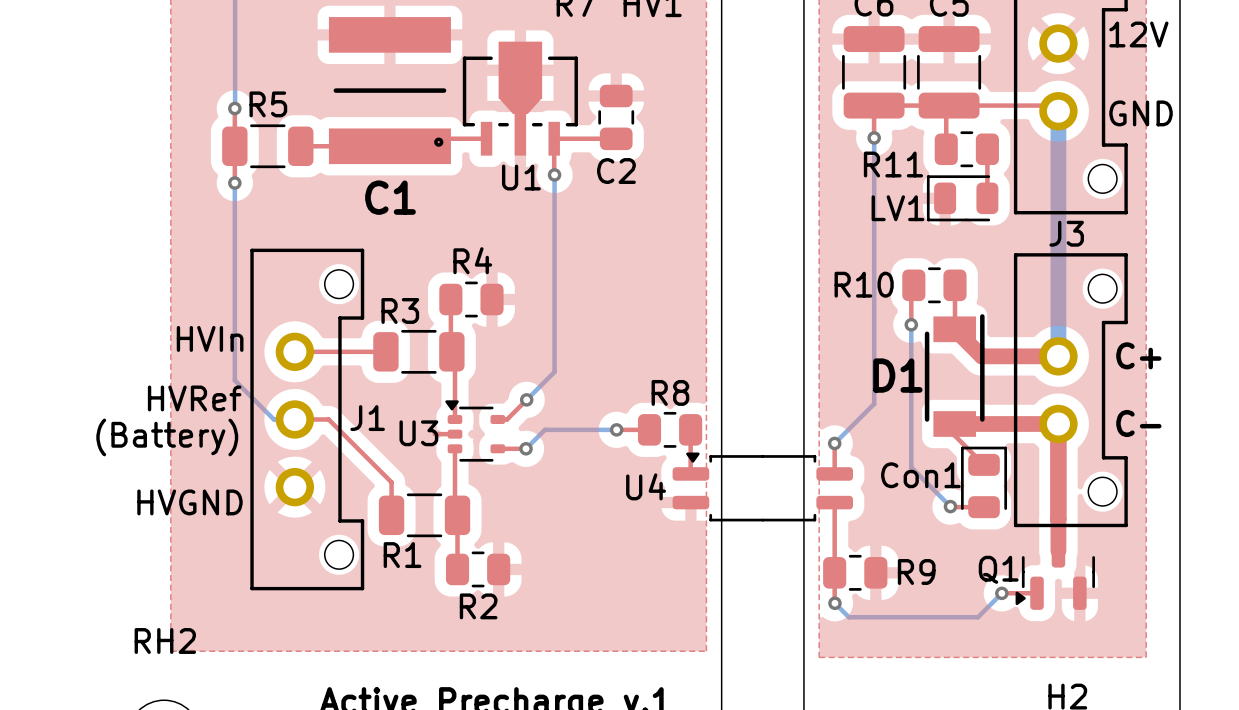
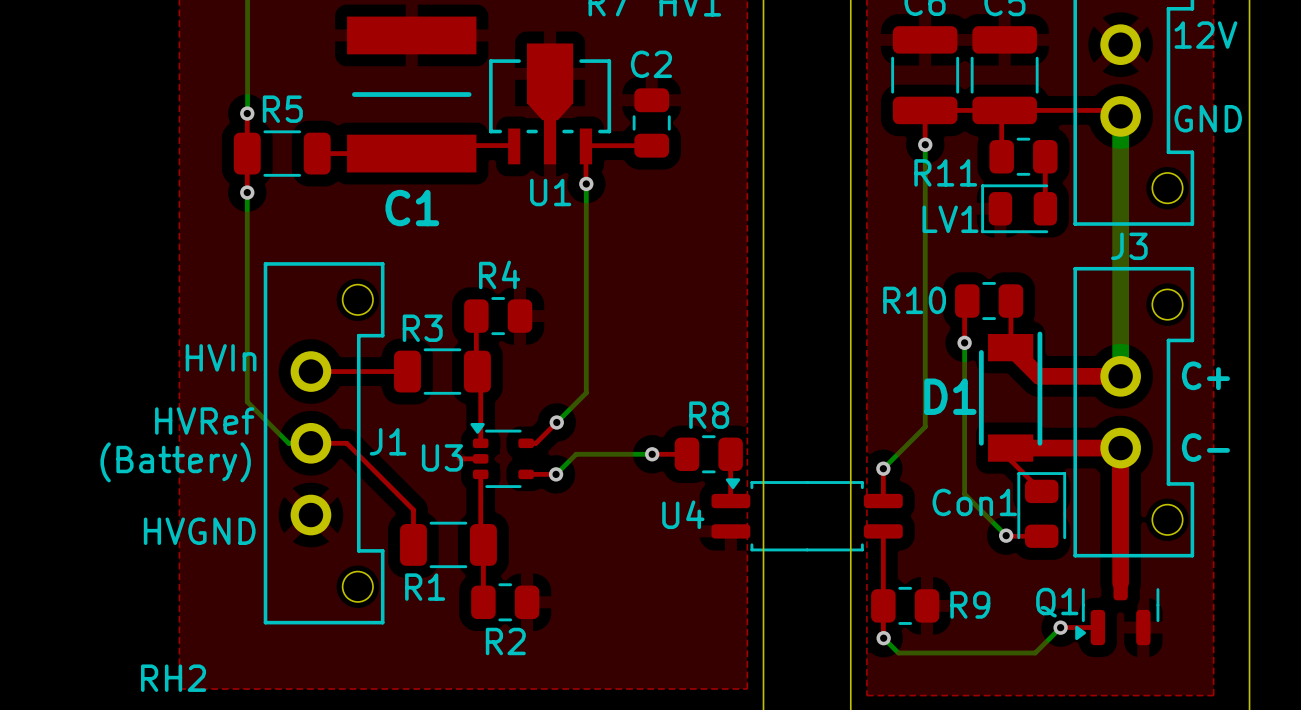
U1 footprint: [434, 41, 578, 156] -> [489, 43, 612, 165]
C2 name position: C2 (616, 171) -> C2 (651, 64)

